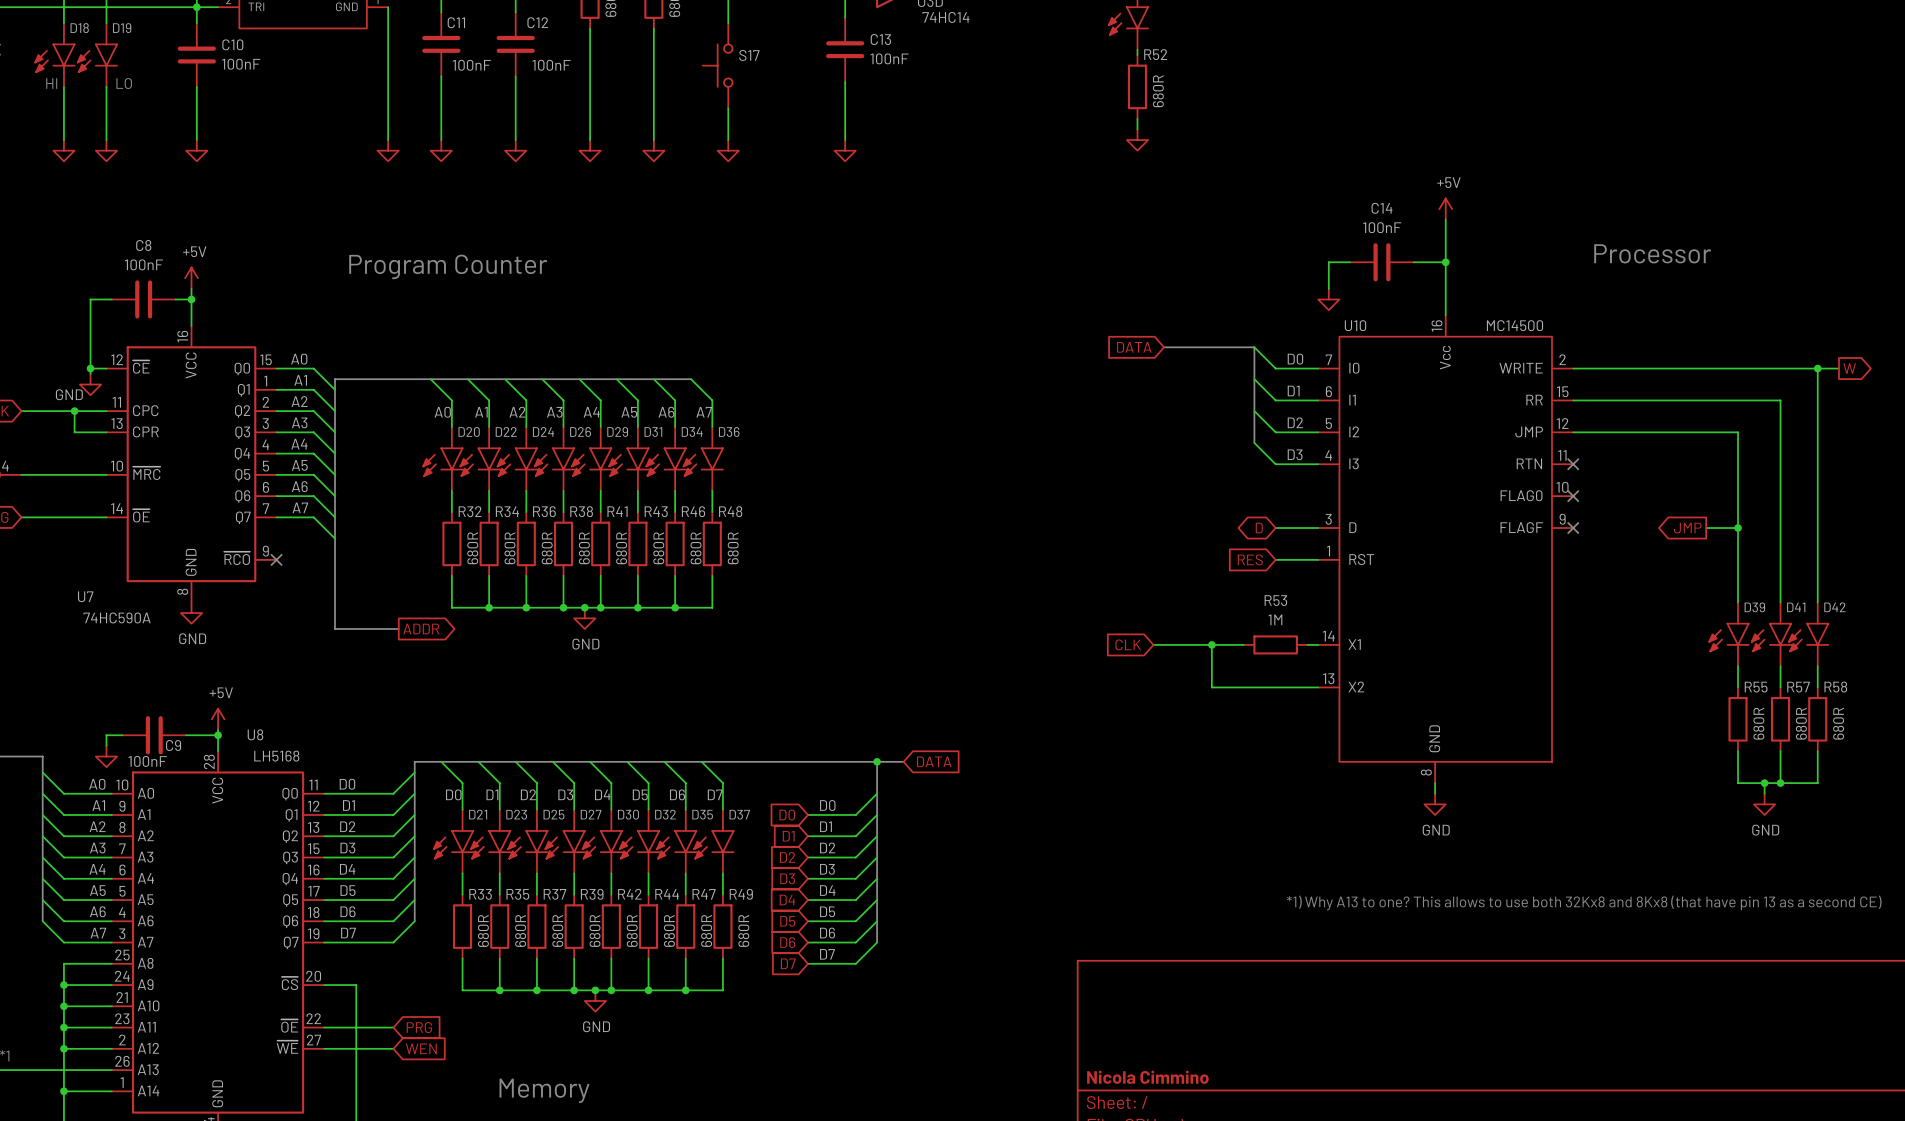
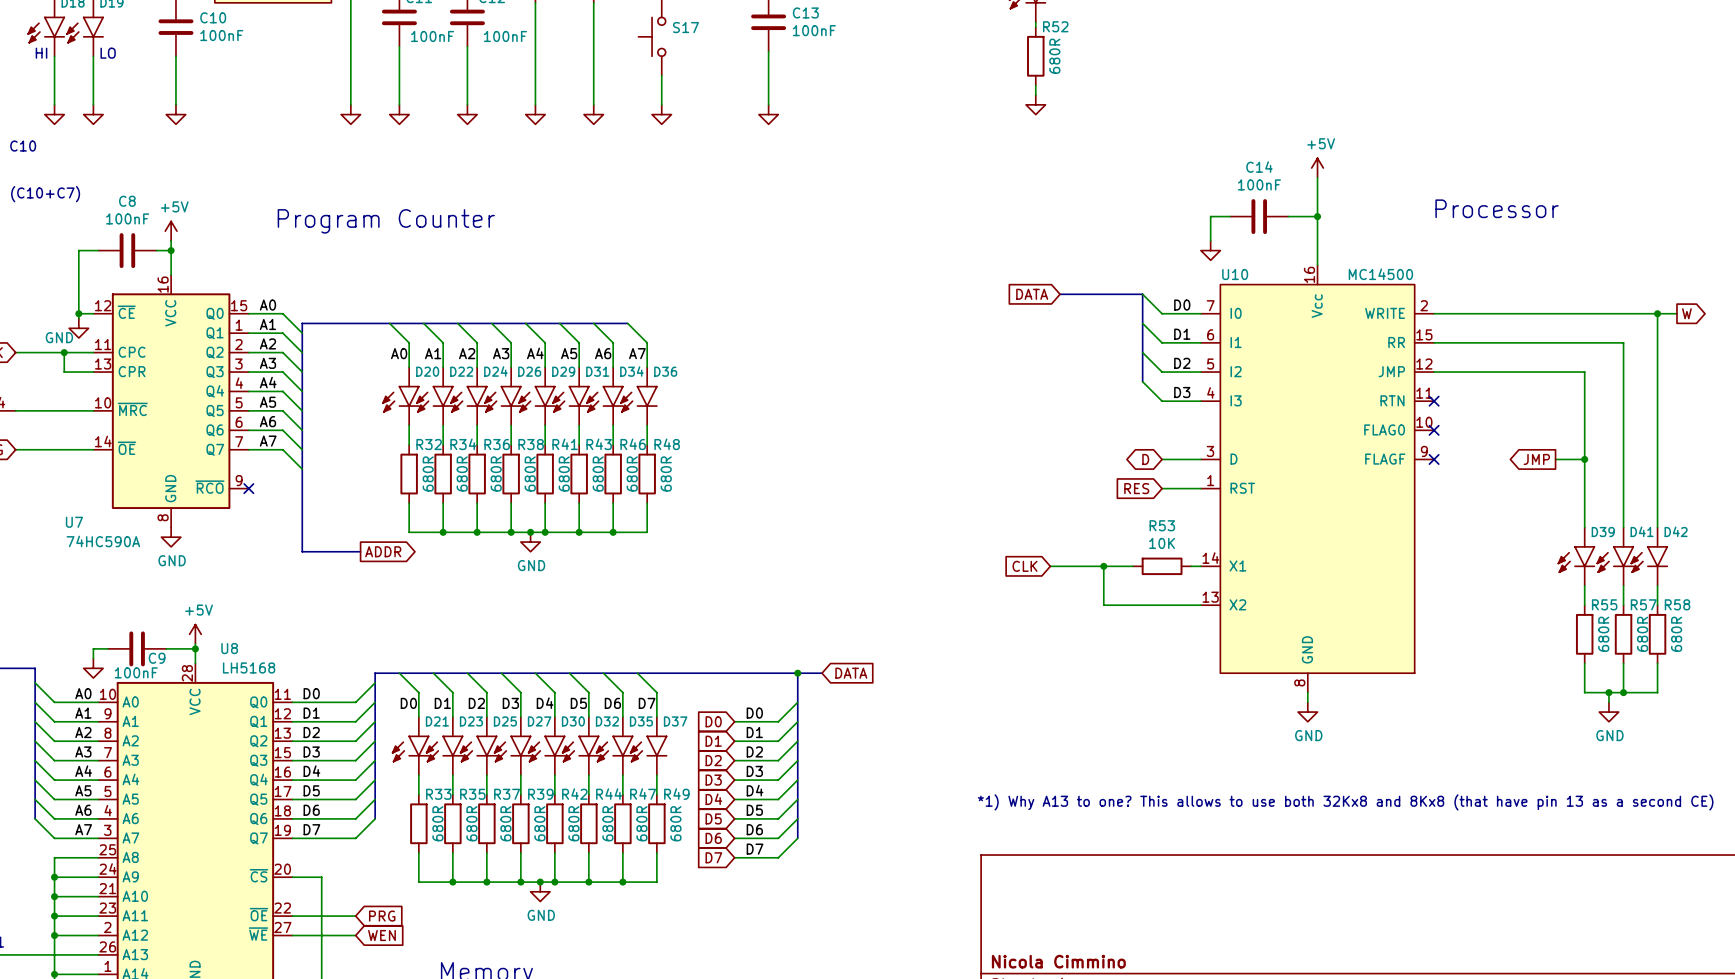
R53 value: 1M (1275, 619) -> 10K (1162, 543)

